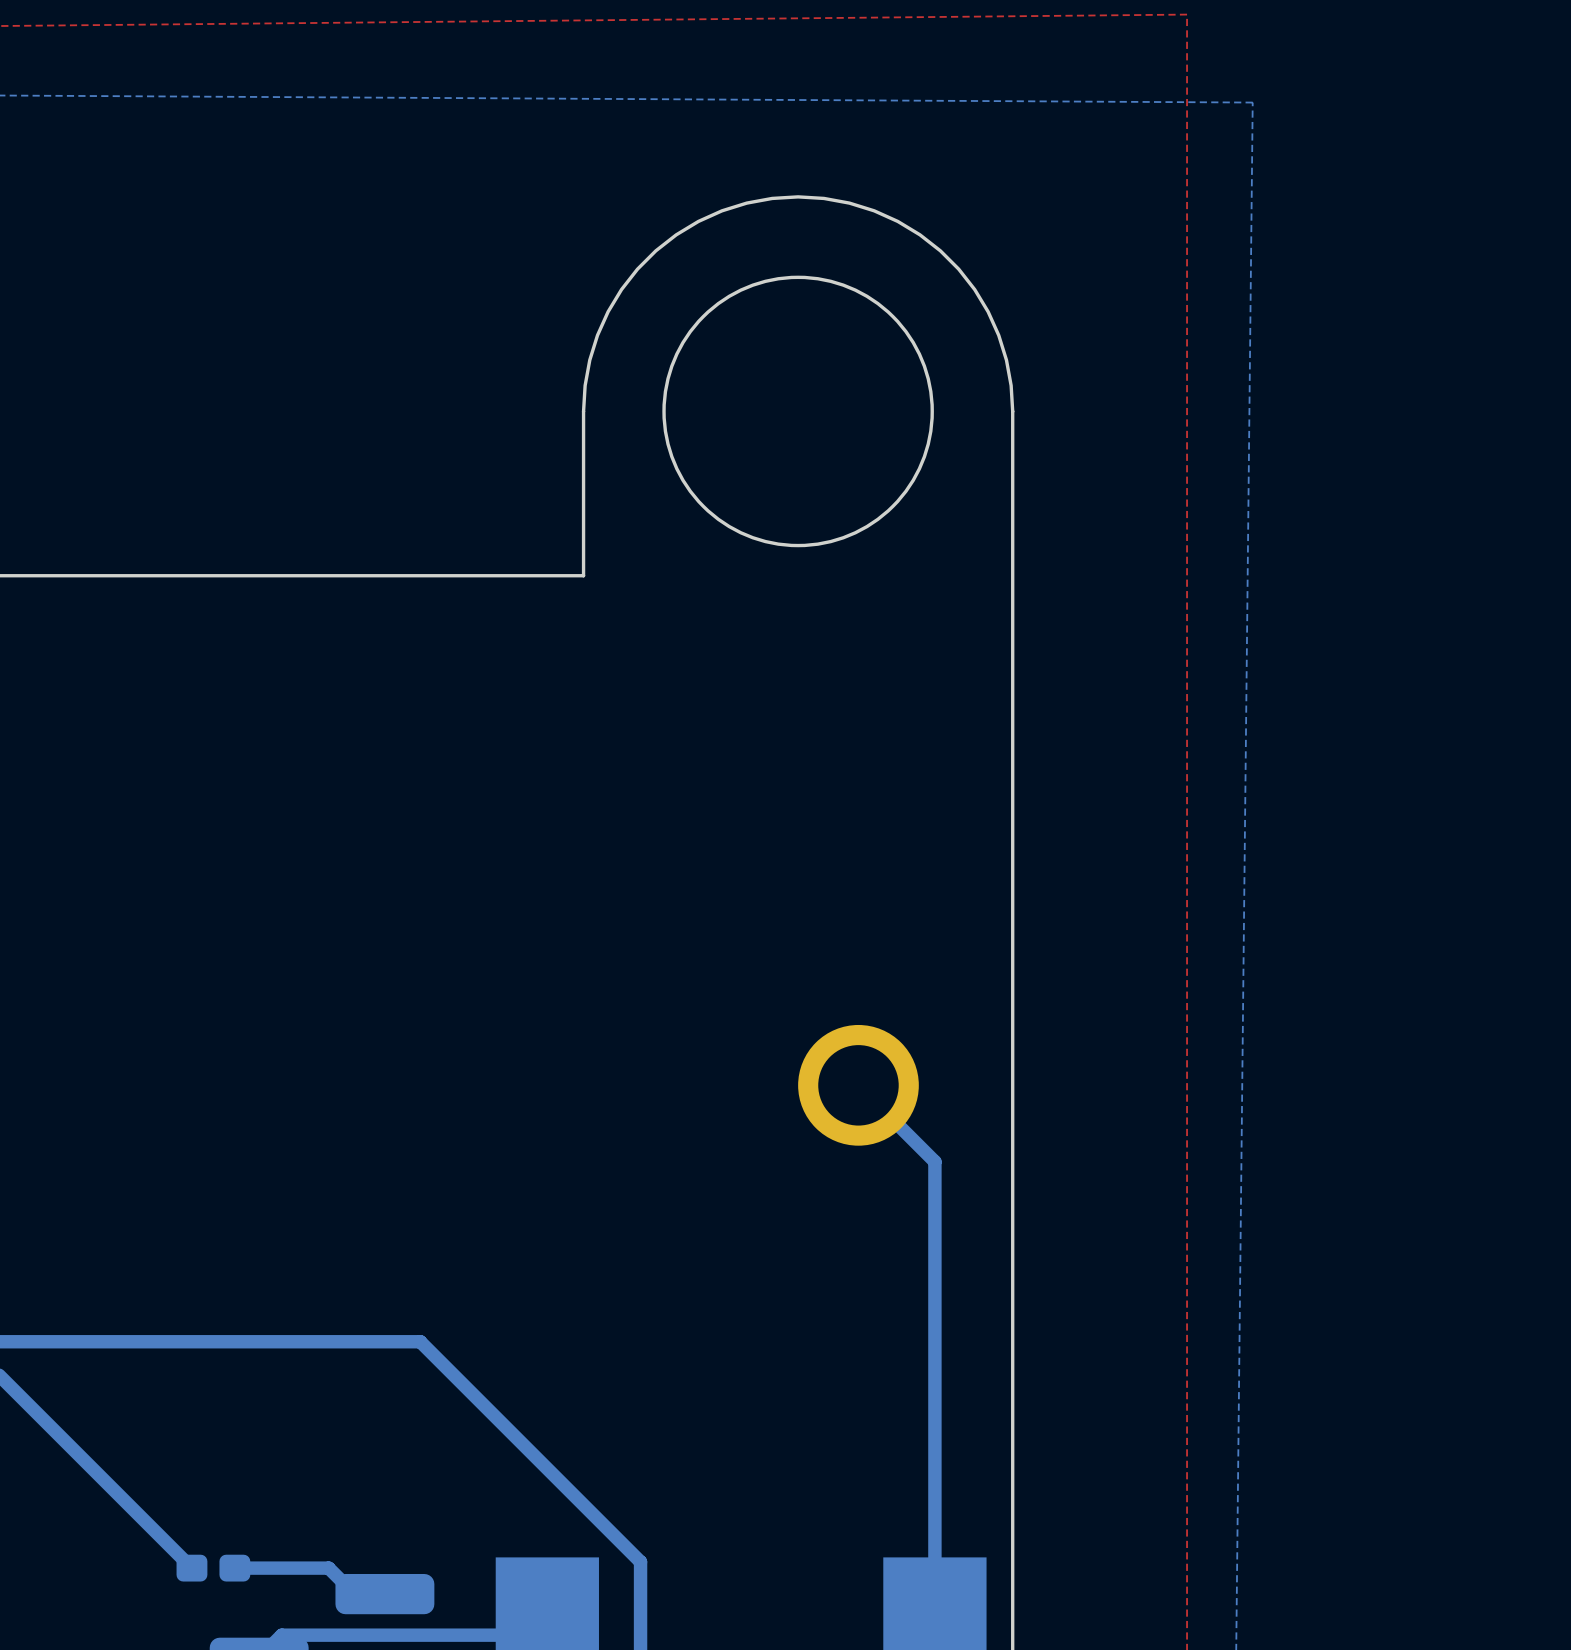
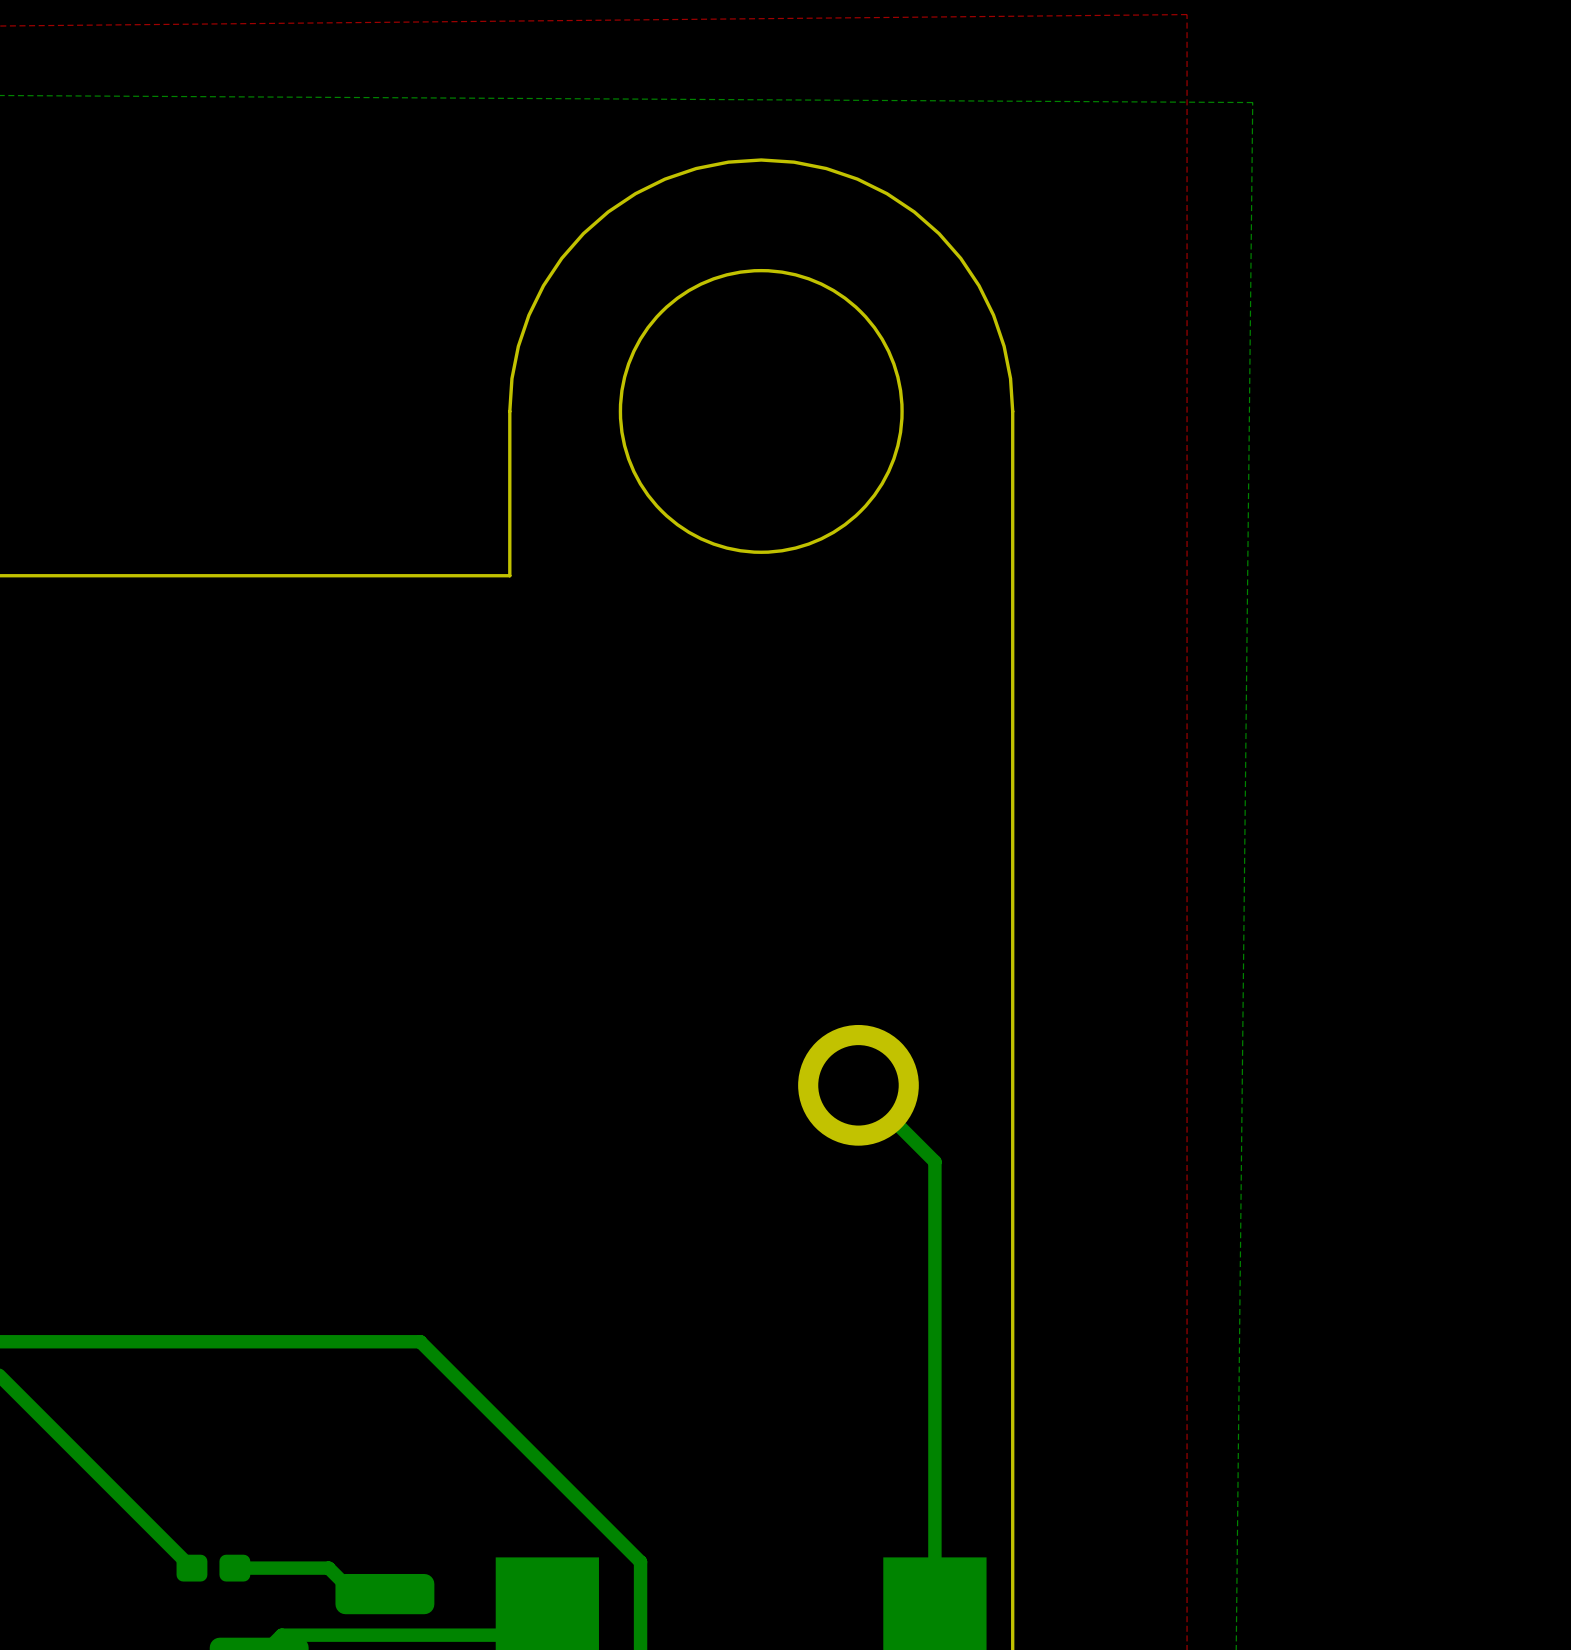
round board edge position: (798, 411) -> (761, 411)
board edge: (1012, 411) (1011, 385) (1006, 360) (998, 335) (988, 311) (974, 289) (958, 269) (940, 250) (920, 234) (897, 221) (874, 210) (849, 203) (823, 198) (798, 196) (772, 198) (746, 203) (722, 210) (698, 221) (676, 234) (655, 250) (637, 269) (621, 289) (608, 311) (597, 335) (589, 360) (585, 385) (583, 411) (583, 575) (509, 575) -> (1012, 411) (1010, 378) (1004, 346) (993, 315) (979, 285) (960, 258) (939, 233) (914, 211) (886, 193) (857, 179) (826, 168) (794, 162) (761, 159) (728, 162) (696, 168) (665, 179) (635, 193) (608, 211) (583, 233) (561, 258) (543, 285) (528, 315) (518, 346) (511, 378) (509, 411) (509, 575)

